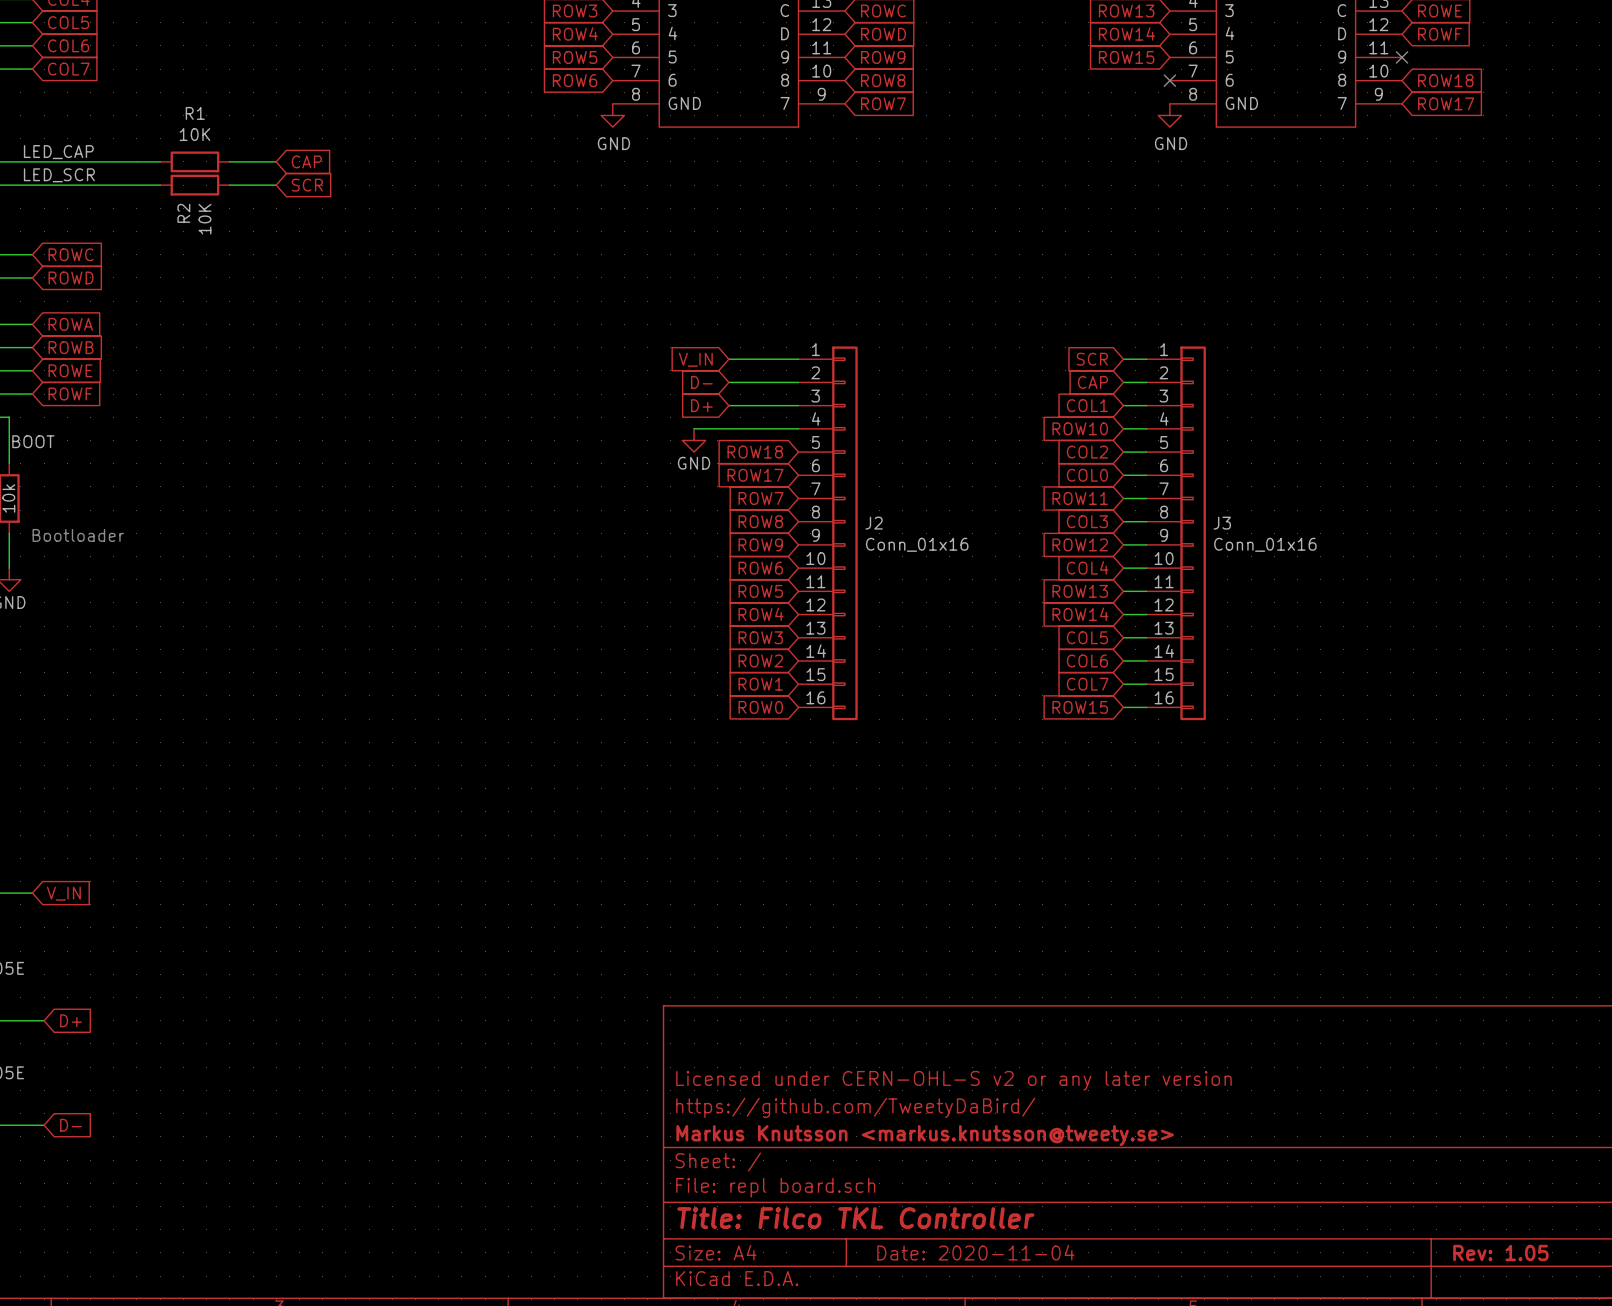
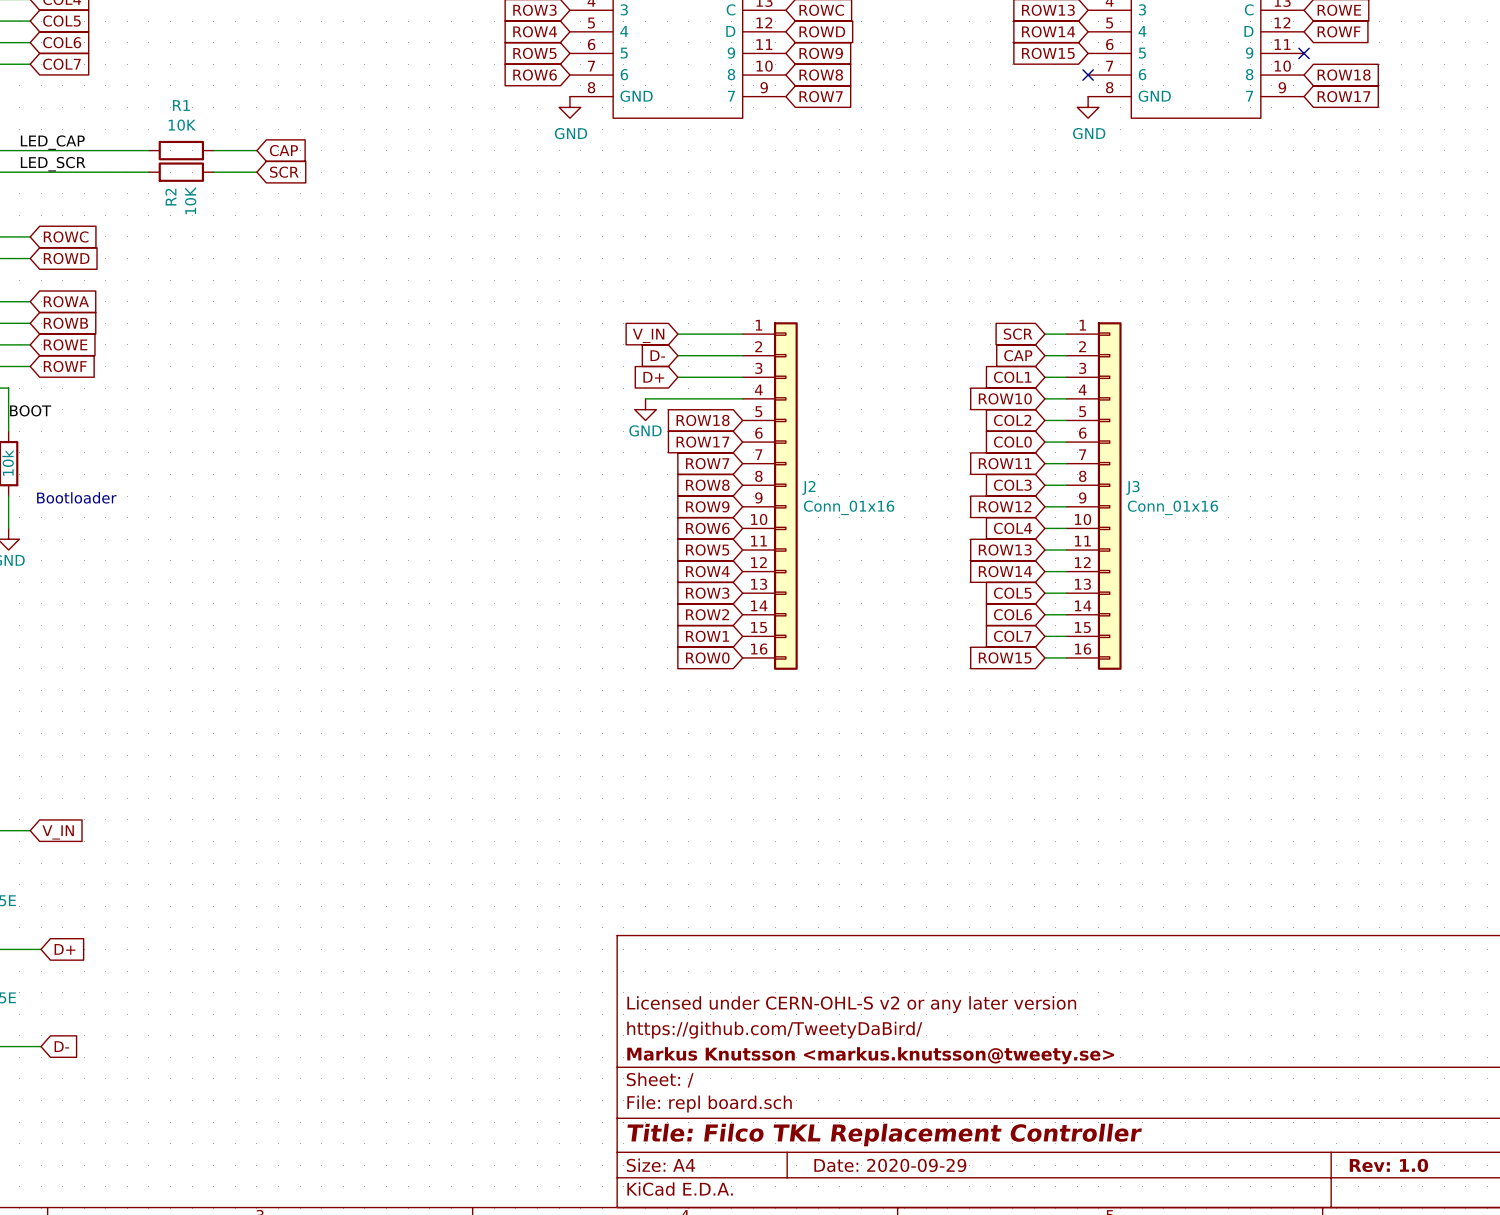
title block: Title: Filco TKL Controller (855, 1218) -> Title: Filco TKL Replacement Controller (884, 1135)
title block: Date: 2020-11-04 (975, 1252) -> Date: 2020-09-29 (890, 1165)
title block: Rev: 1.05 (1500, 1253) -> Rev: 1.0 (1388, 1165)

